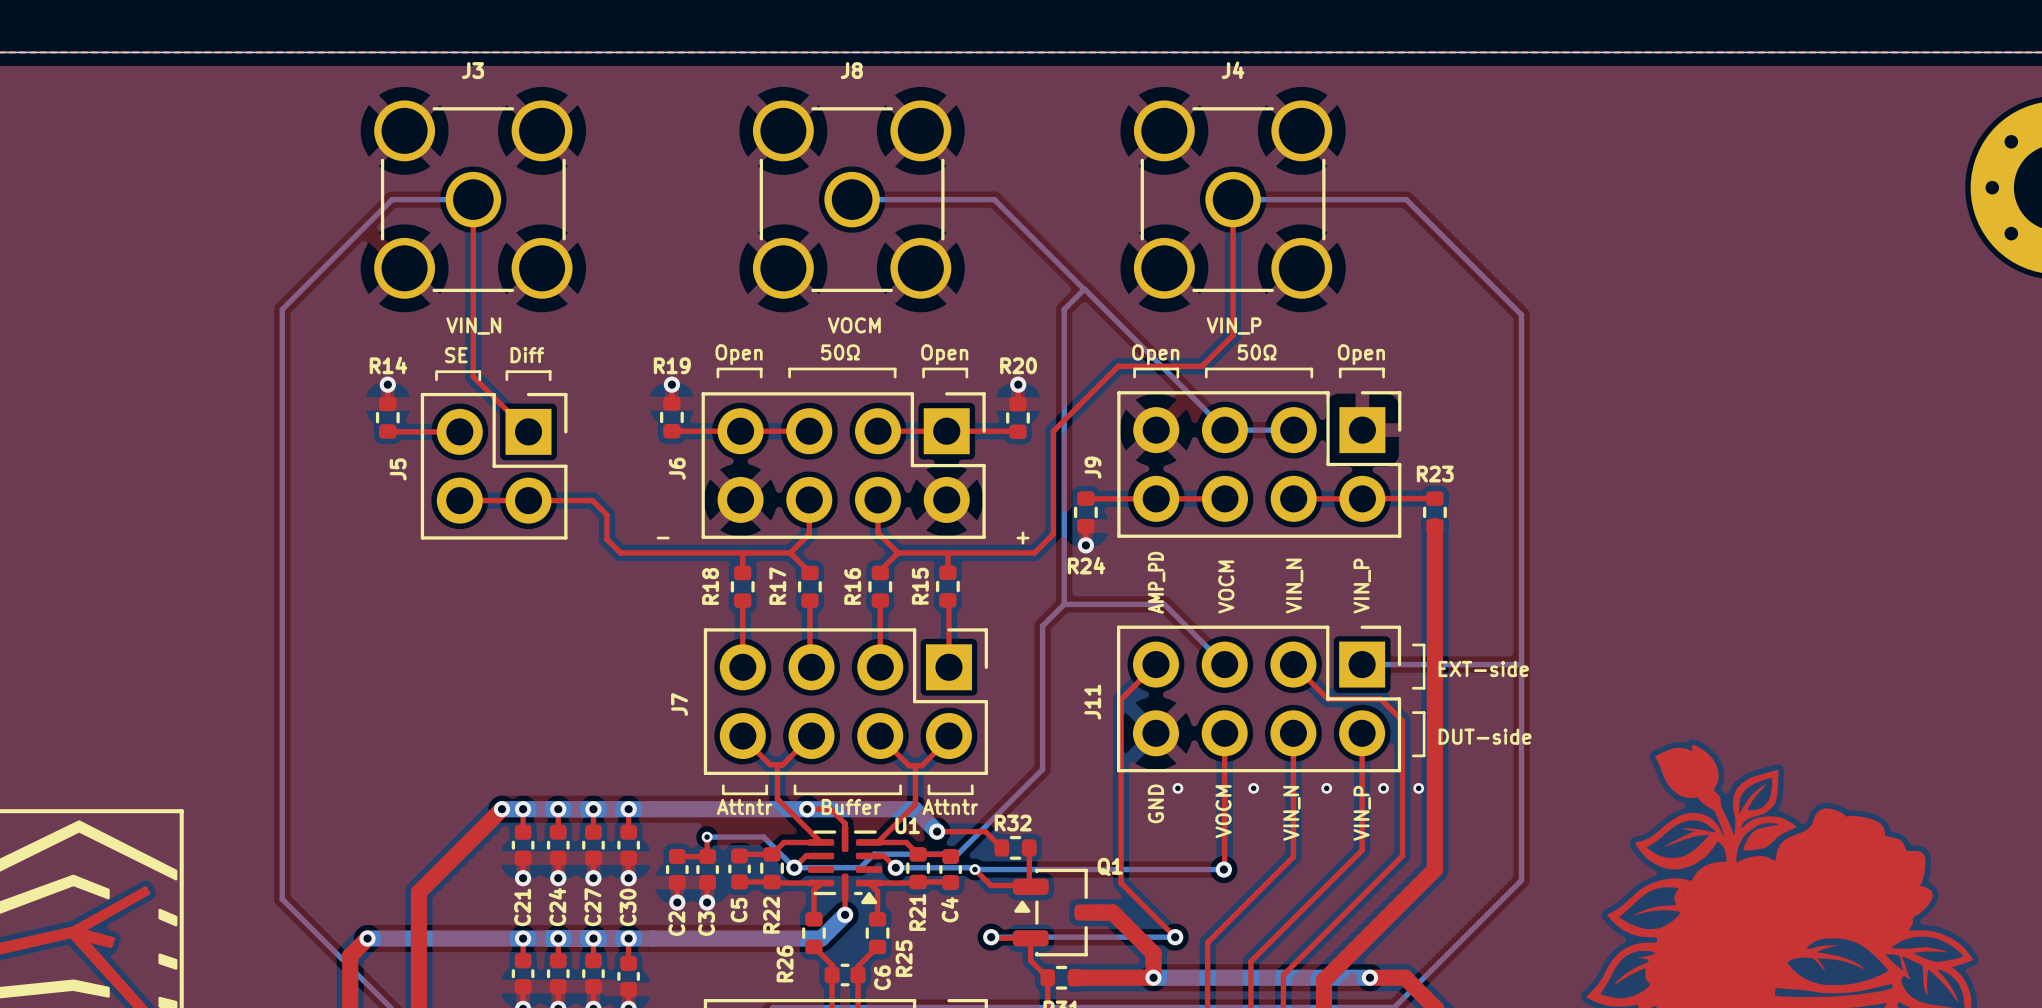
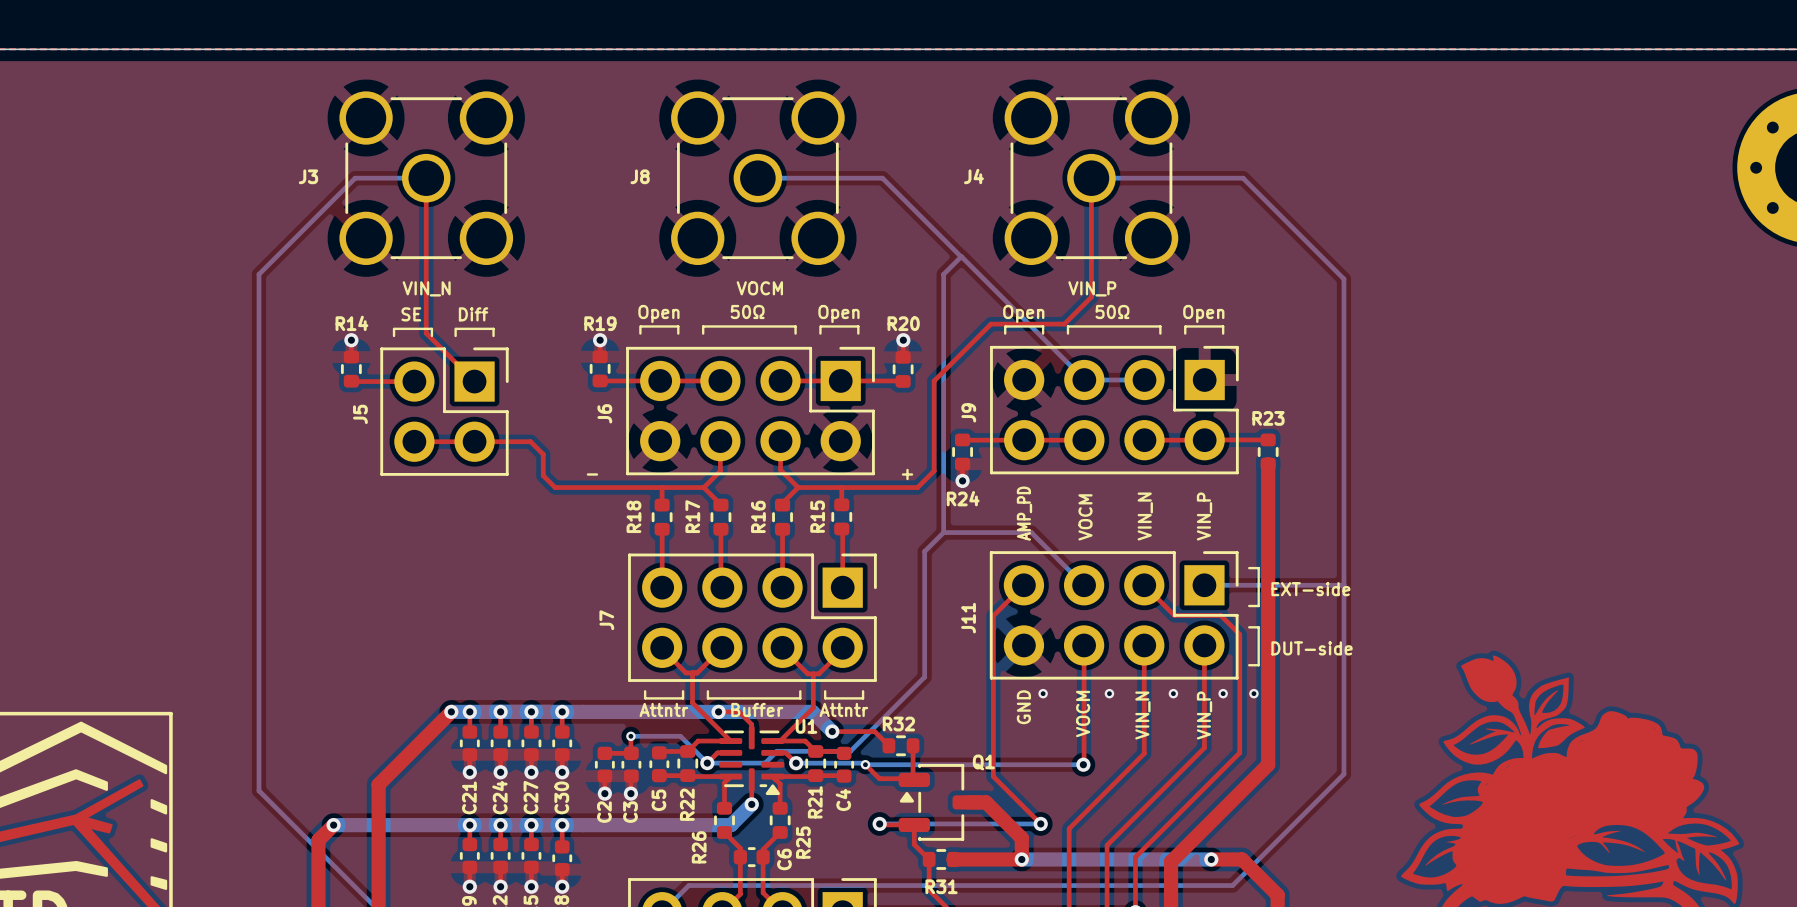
J3 name position: J3 (473, 70) -> J3 (308, 176)
J8 name position: J8 (851, 70) -> J8 (640, 176)
J4 name position: J4 (1233, 70) -> J4 (973, 176)

